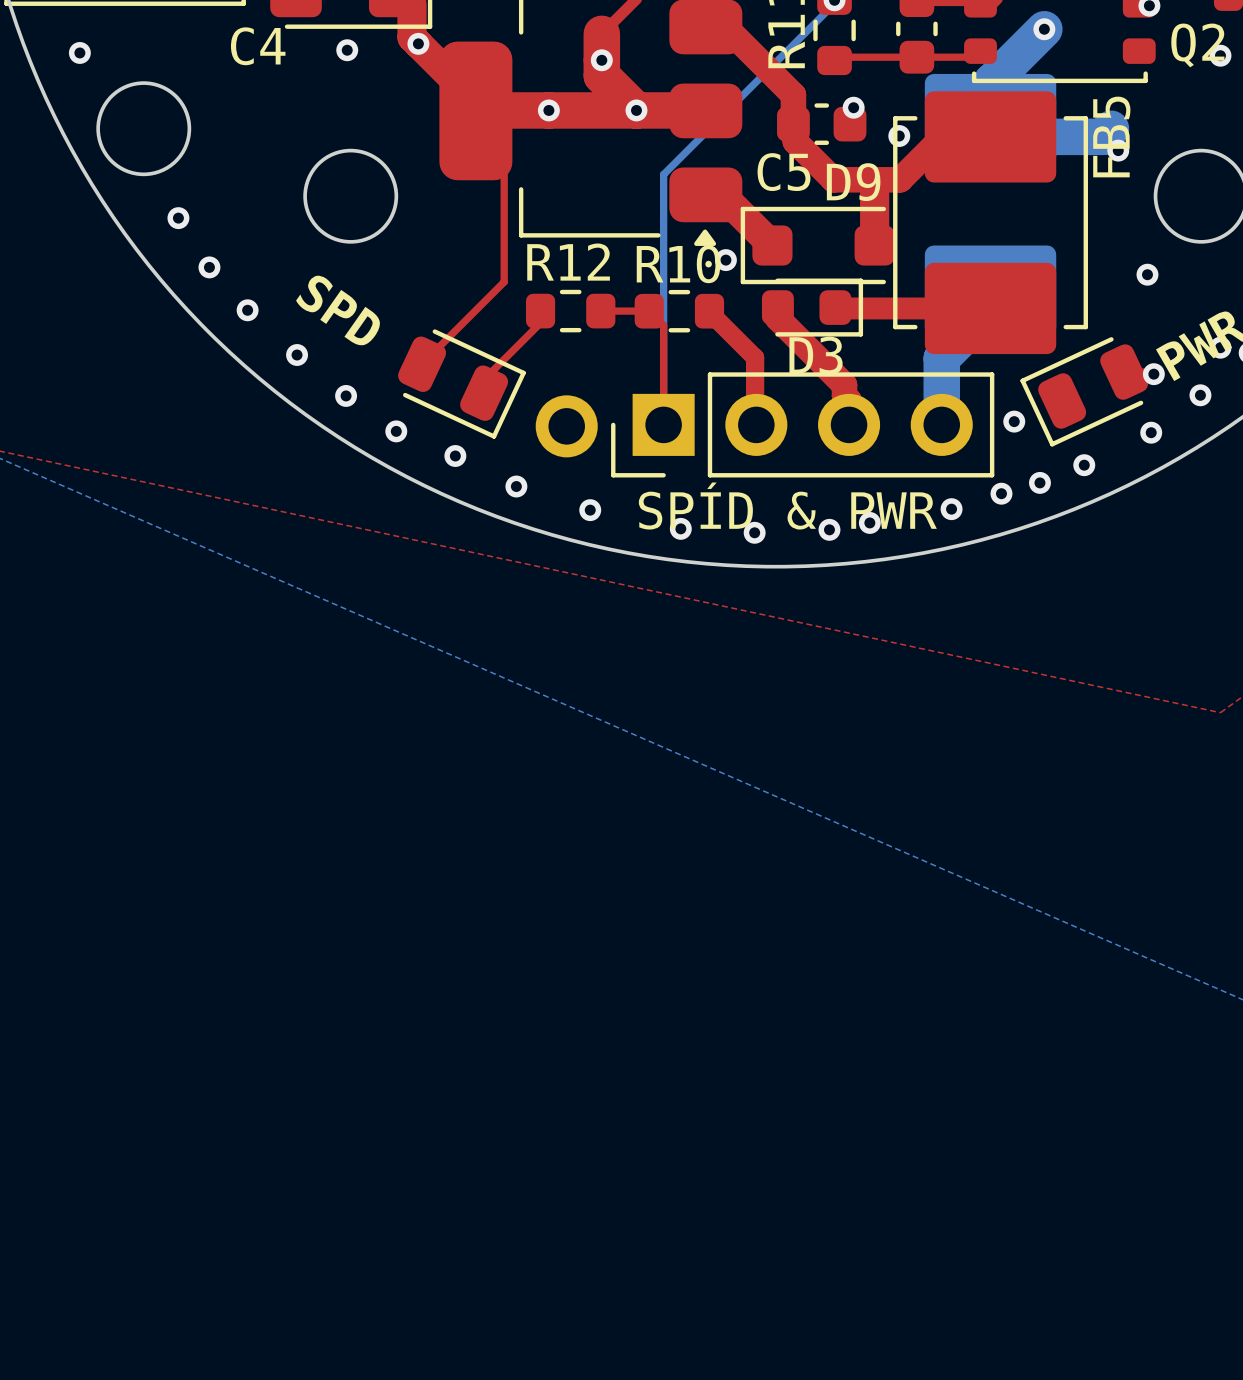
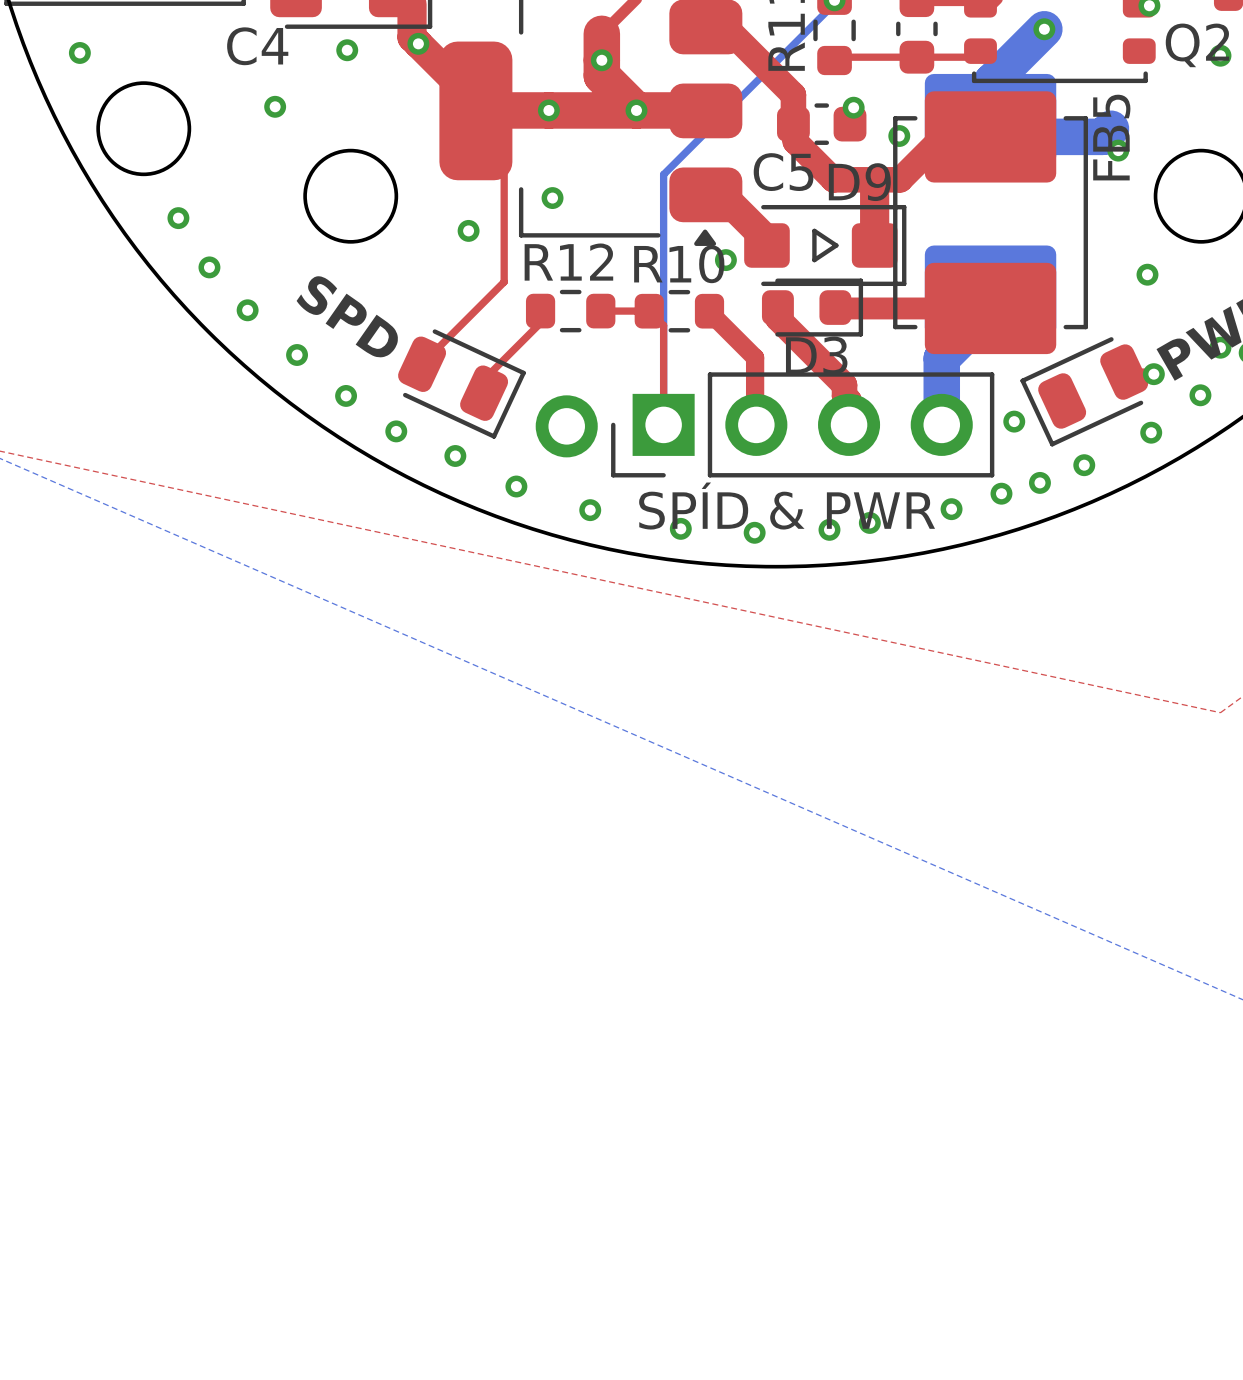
via: none -> (275, 106)
via: none -> (552, 198)
D9 footprint: [740, 206, 895, 285] -> [744, 204, 907, 287]
via: none -> (468, 230)

